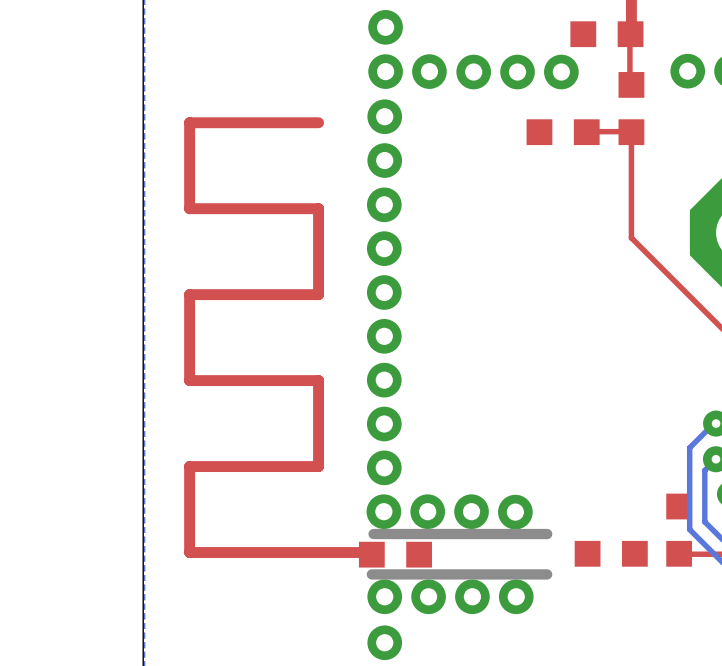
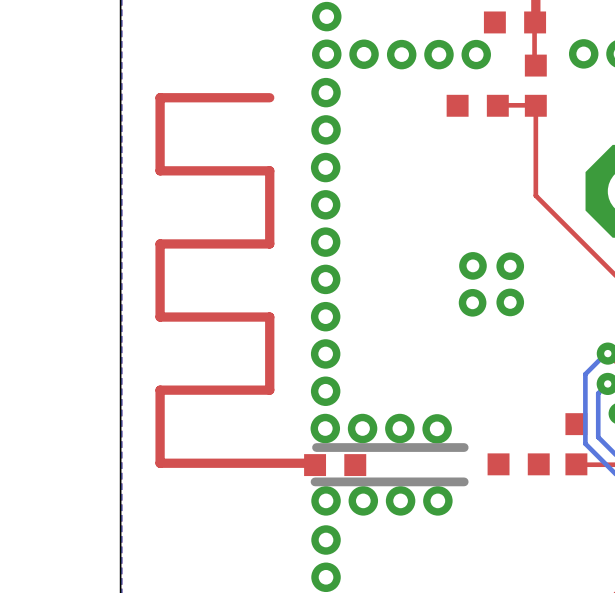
via: none -> (472, 265)
via: none -> (510, 266)
via: none -> (472, 302)
via: none -> (510, 302)

